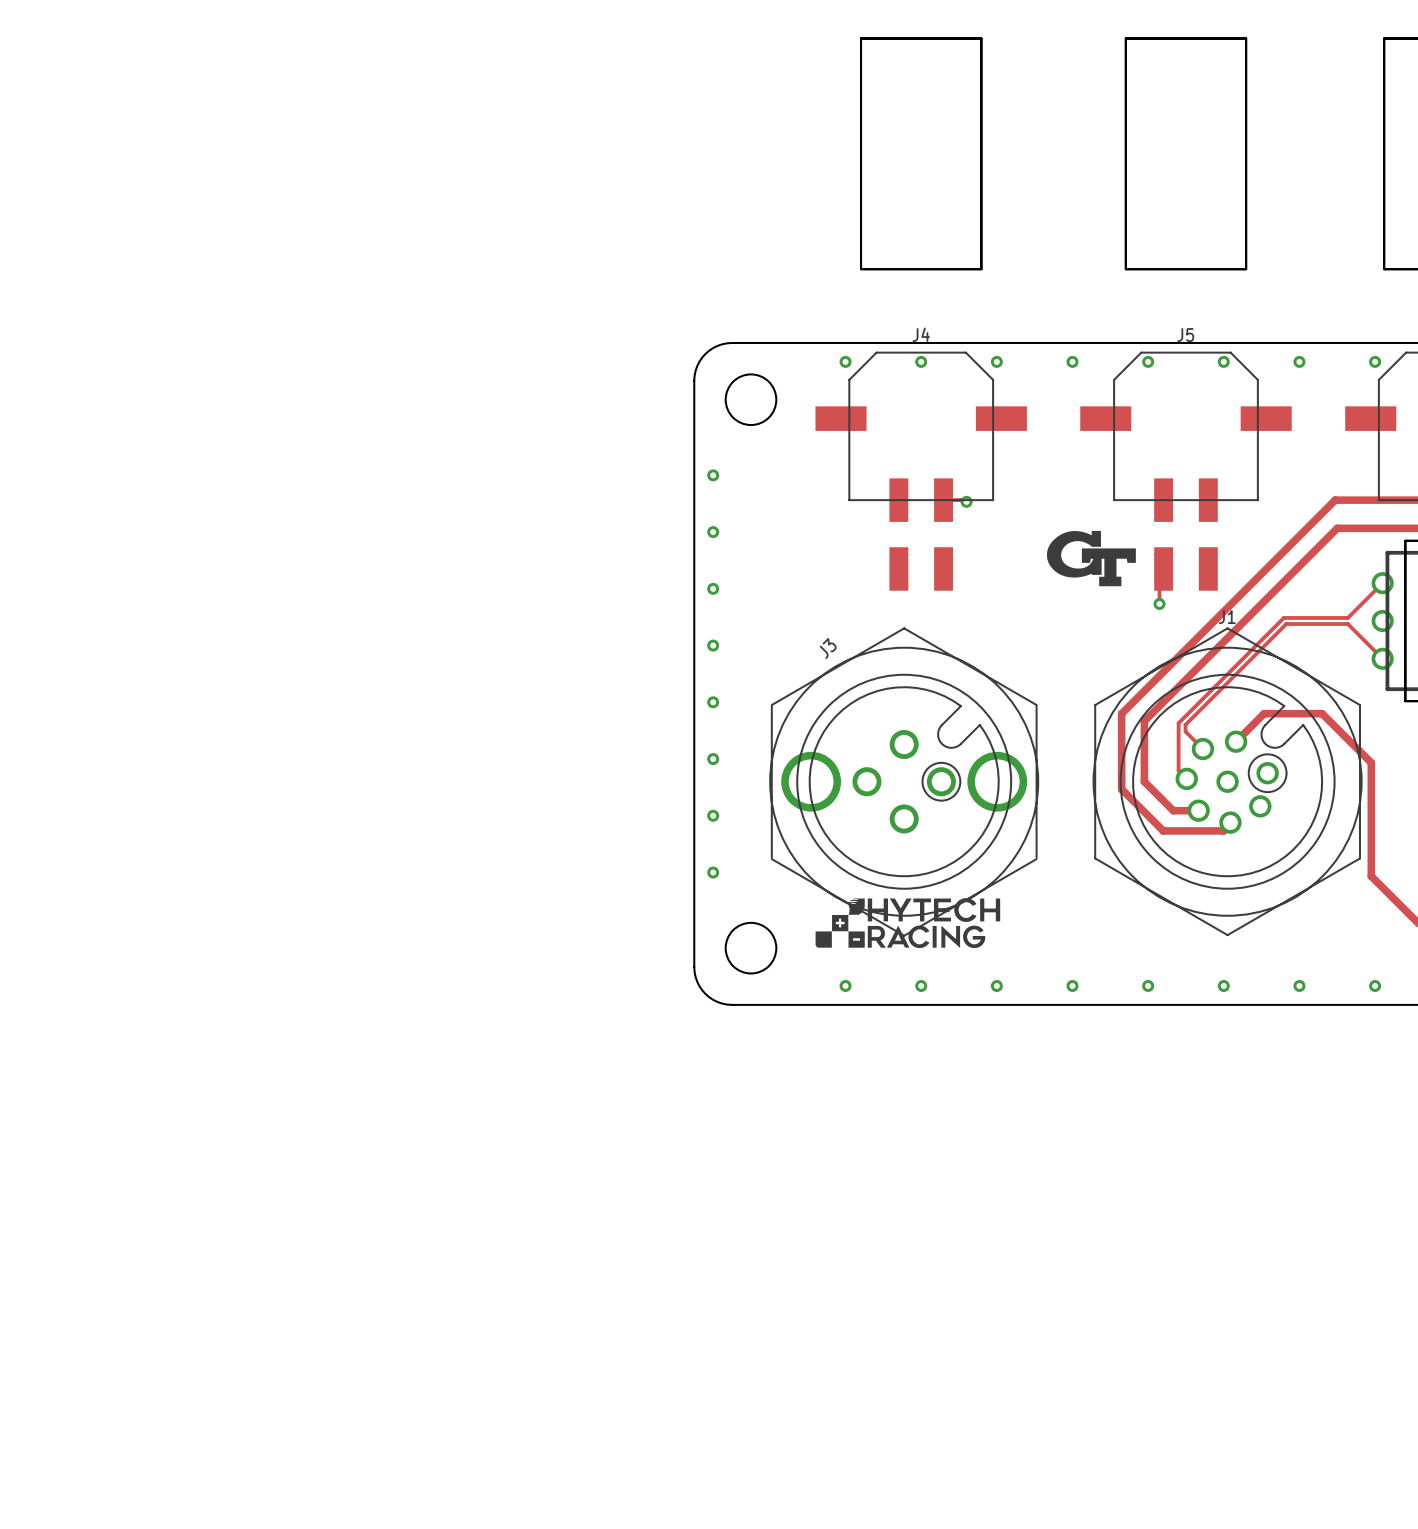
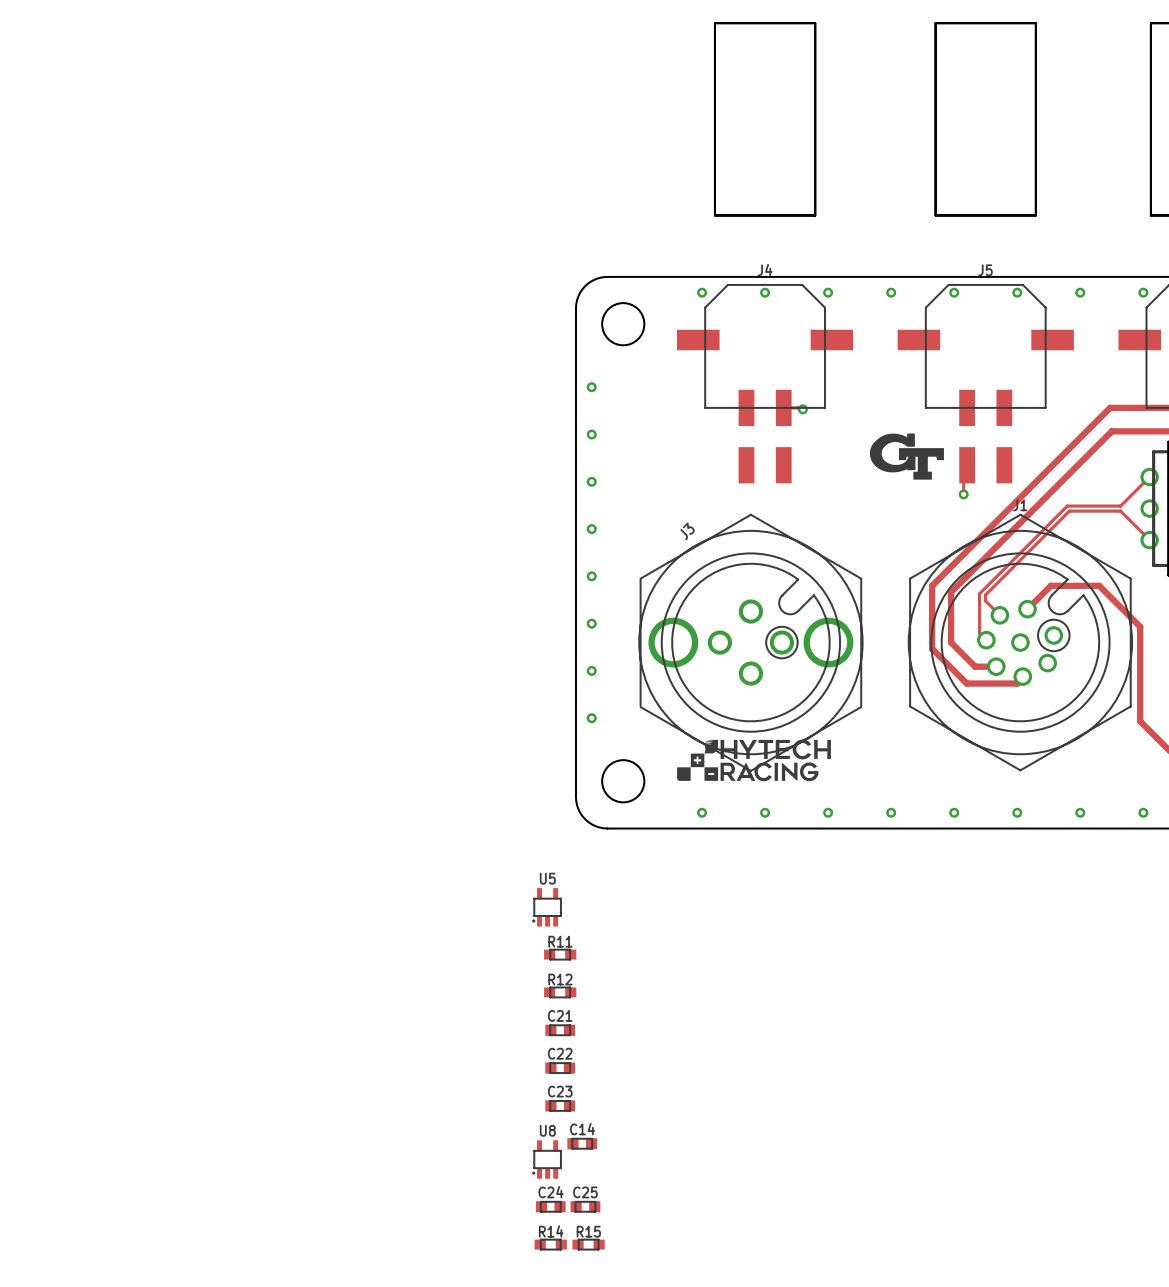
U5: none -> (546, 907)
R11: none -> (560, 954)
R12: none -> (560, 992)
C21: none -> (560, 1030)
C22: none -> (560, 1068)
C23: none -> (560, 1105)
C14: none -> (582, 1143)
U8: none -> (546, 1159)
C24: none -> (550, 1206)
C25: none -> (585, 1206)
R14: none -> (550, 1244)
R15: none -> (588, 1244)

